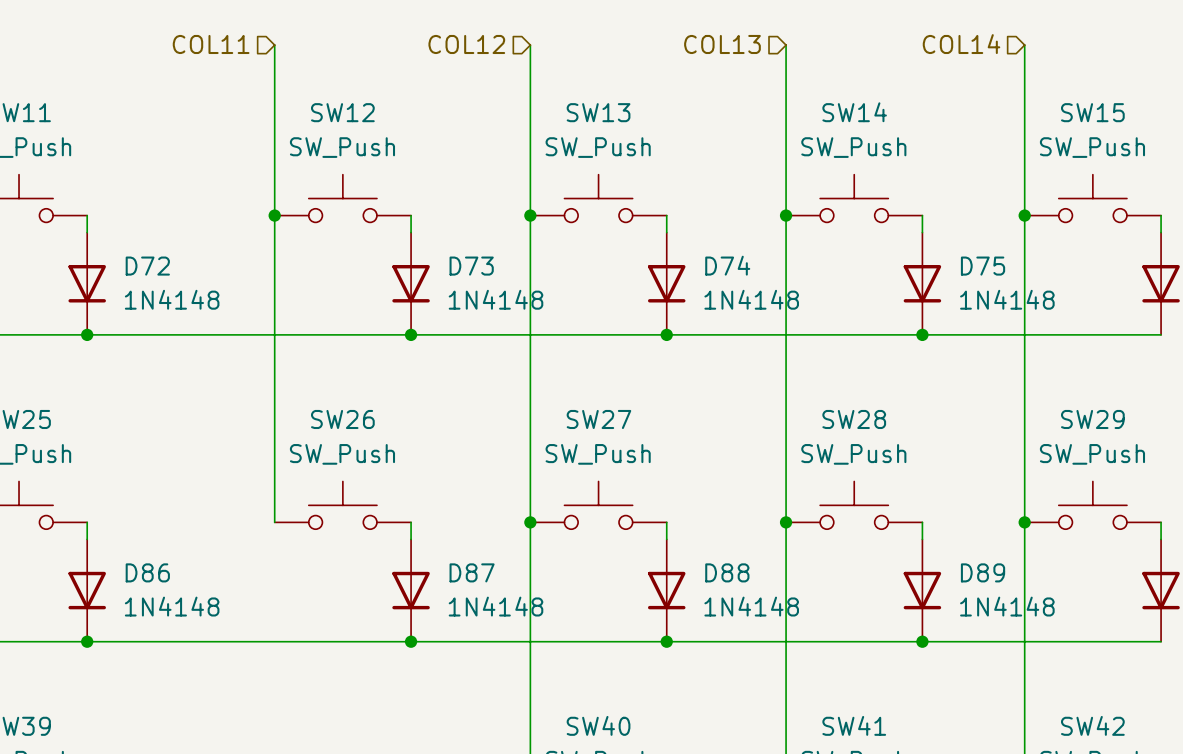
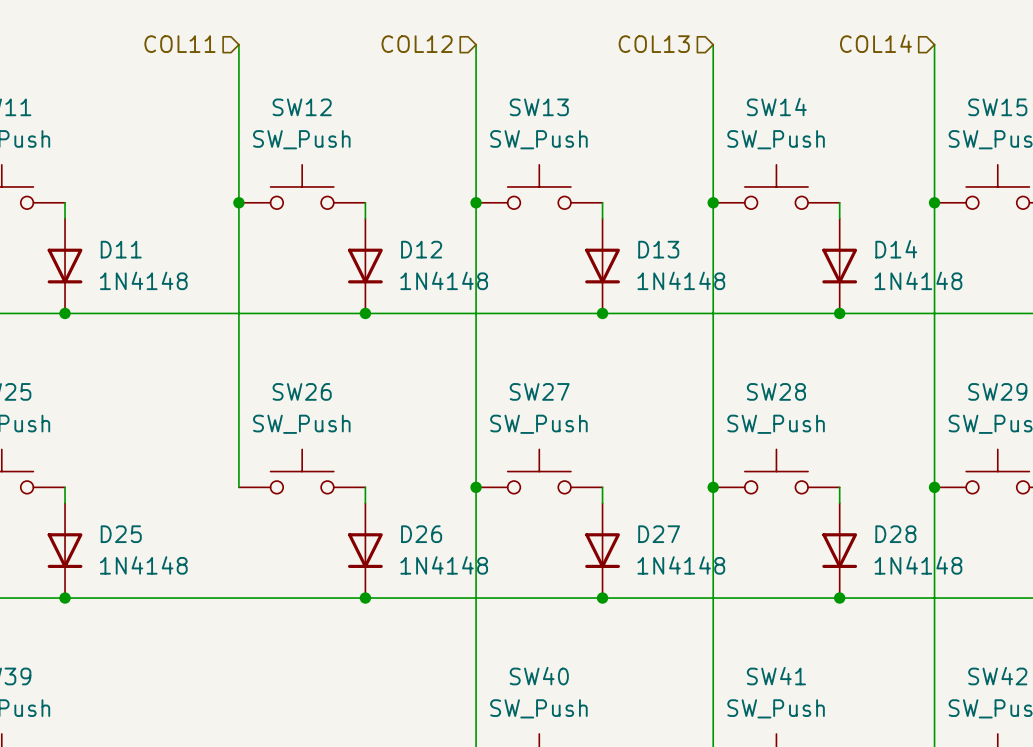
D74 name: D74 (727, 265) -> D13 (658, 249)
D72 name: D72 (147, 266) -> D11 (121, 249)
D73 name: D73 (471, 266) -> D12 (421, 249)
D75 name: D75 (983, 266) -> D14 (896, 249)
D86 name: D86 (147, 572) -> D25 (121, 534)
D87 name: D87 (472, 572) -> D26 (421, 534)
D88 name: D88 (727, 572) -> D27 (659, 534)
D89 name: D89 (983, 572) -> D28 (895, 534)

